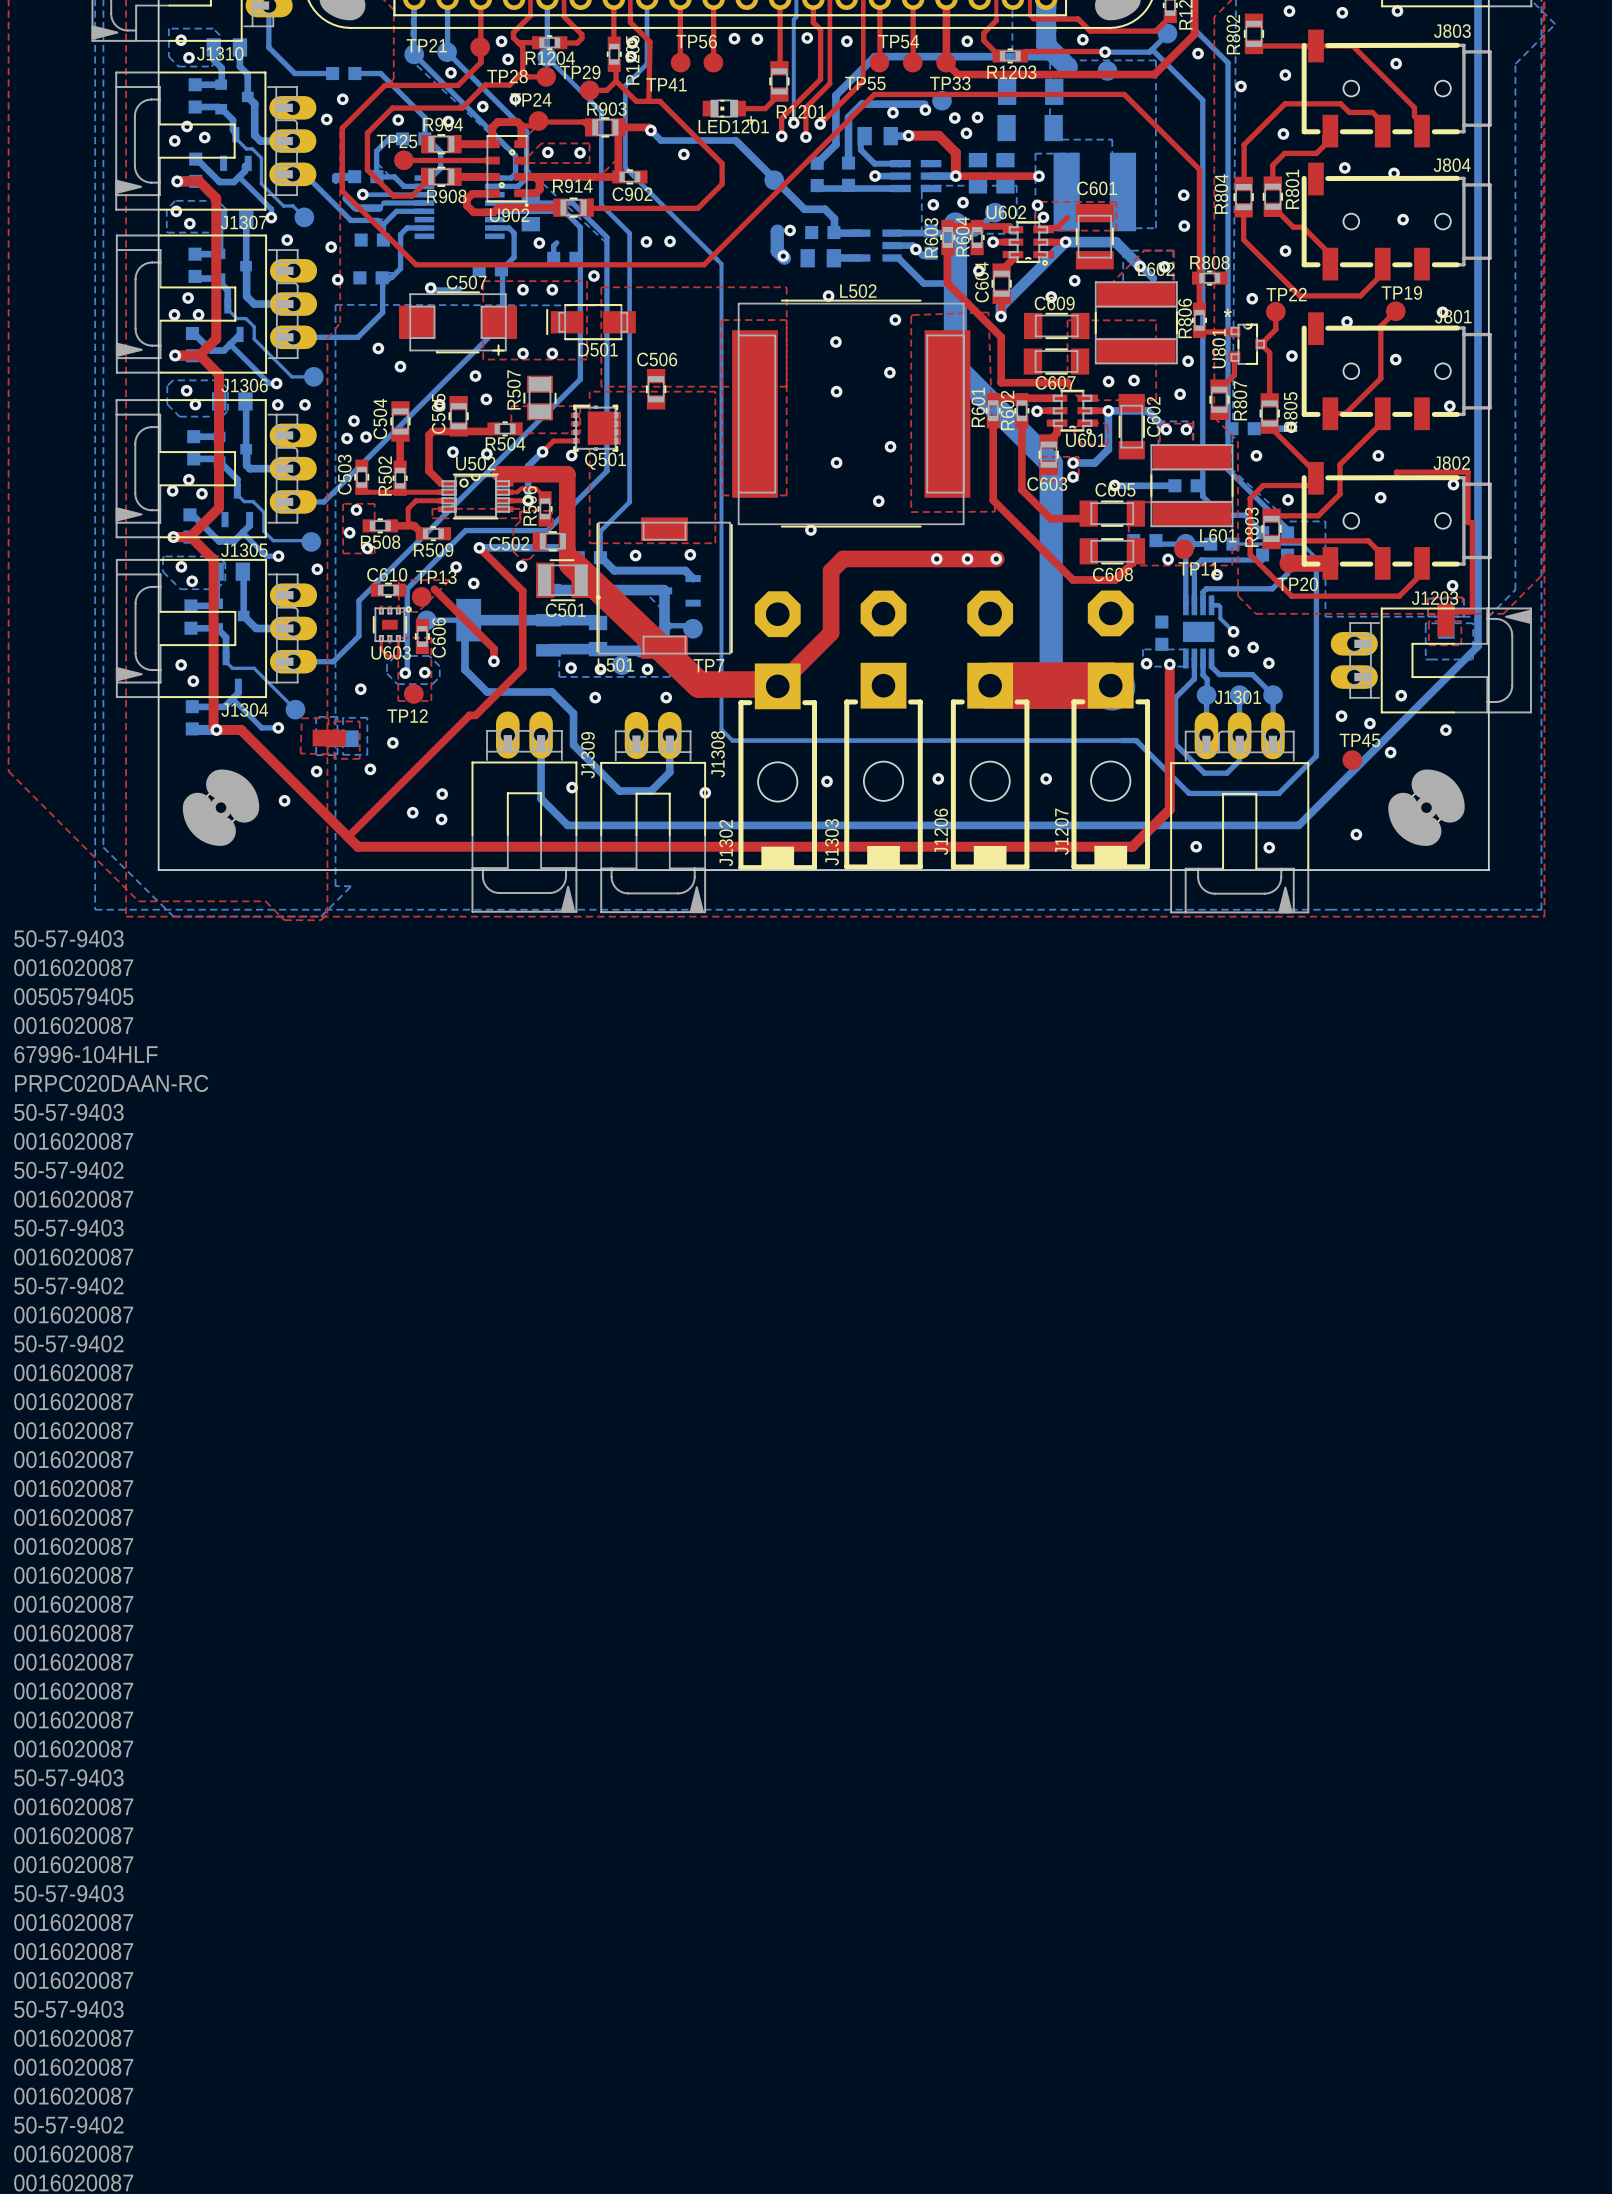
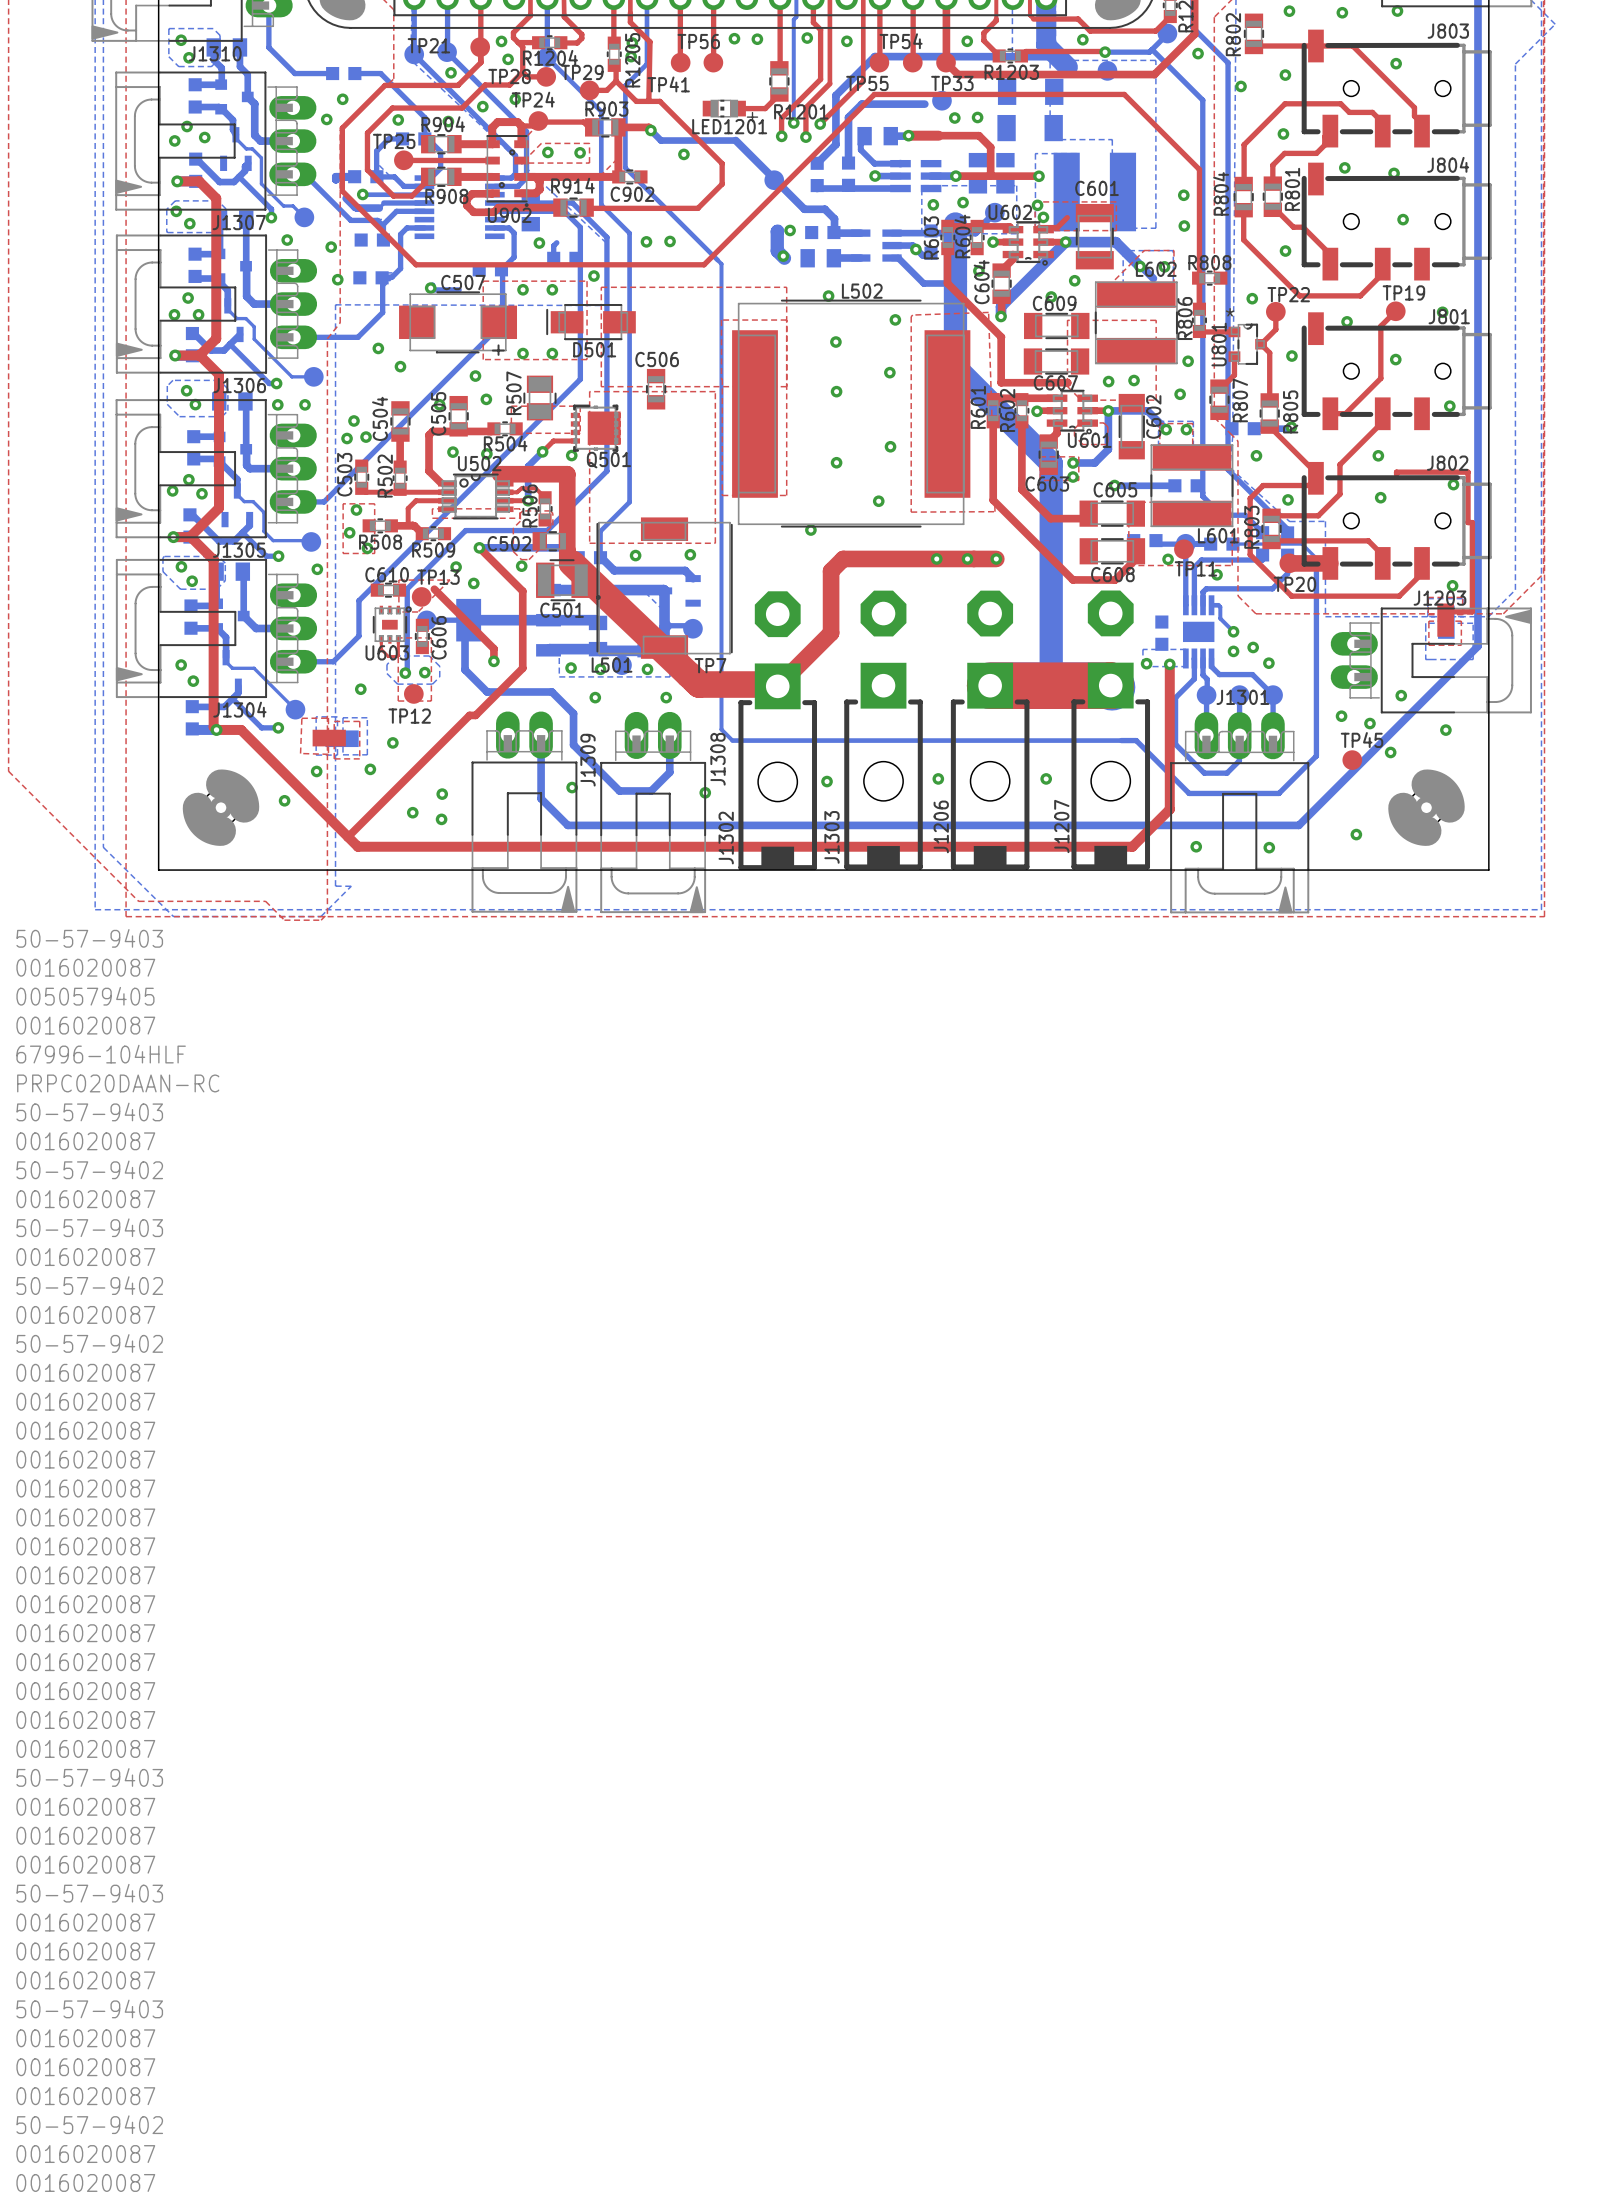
via: (925, 110) -> none
via: (893, 112) -> none
via: (966, 133) -> none
top track: (938, 135) (955, 152) (955, 176) -> (938, 135) (979, 135) (990, 147) (990, 175)

